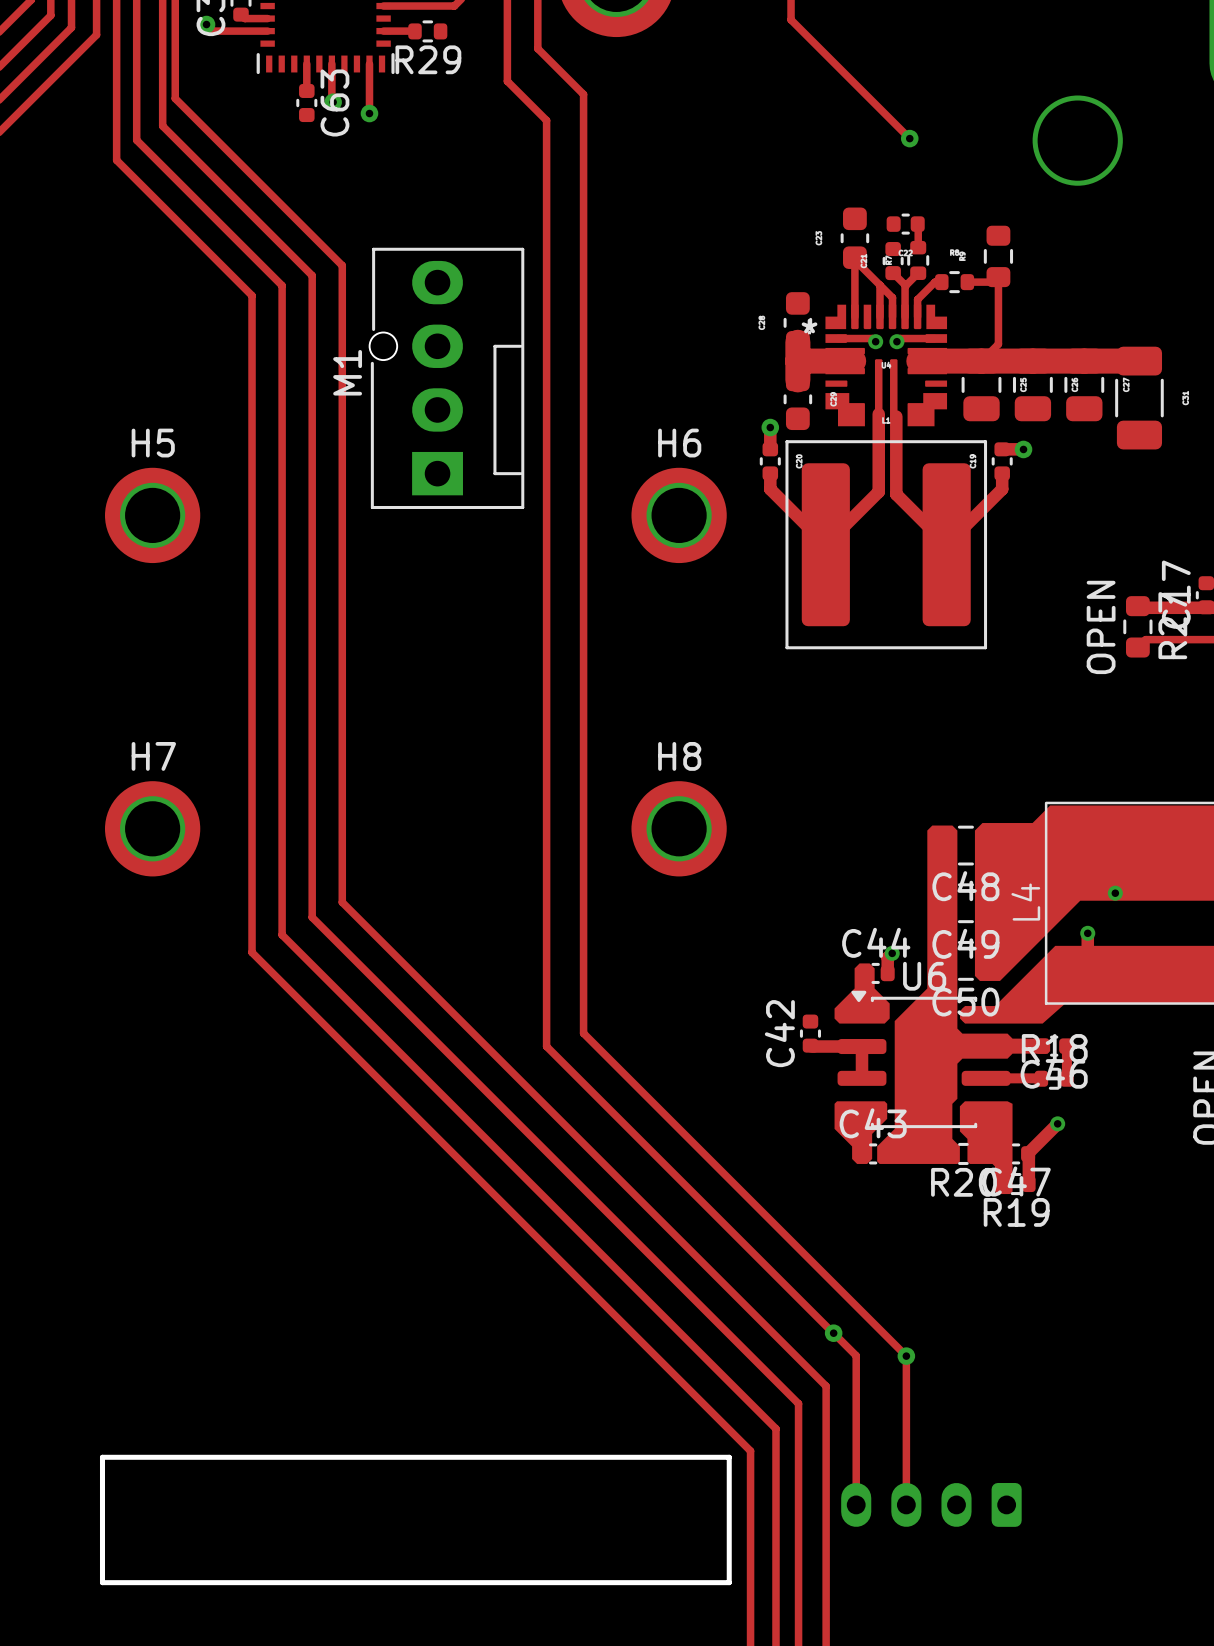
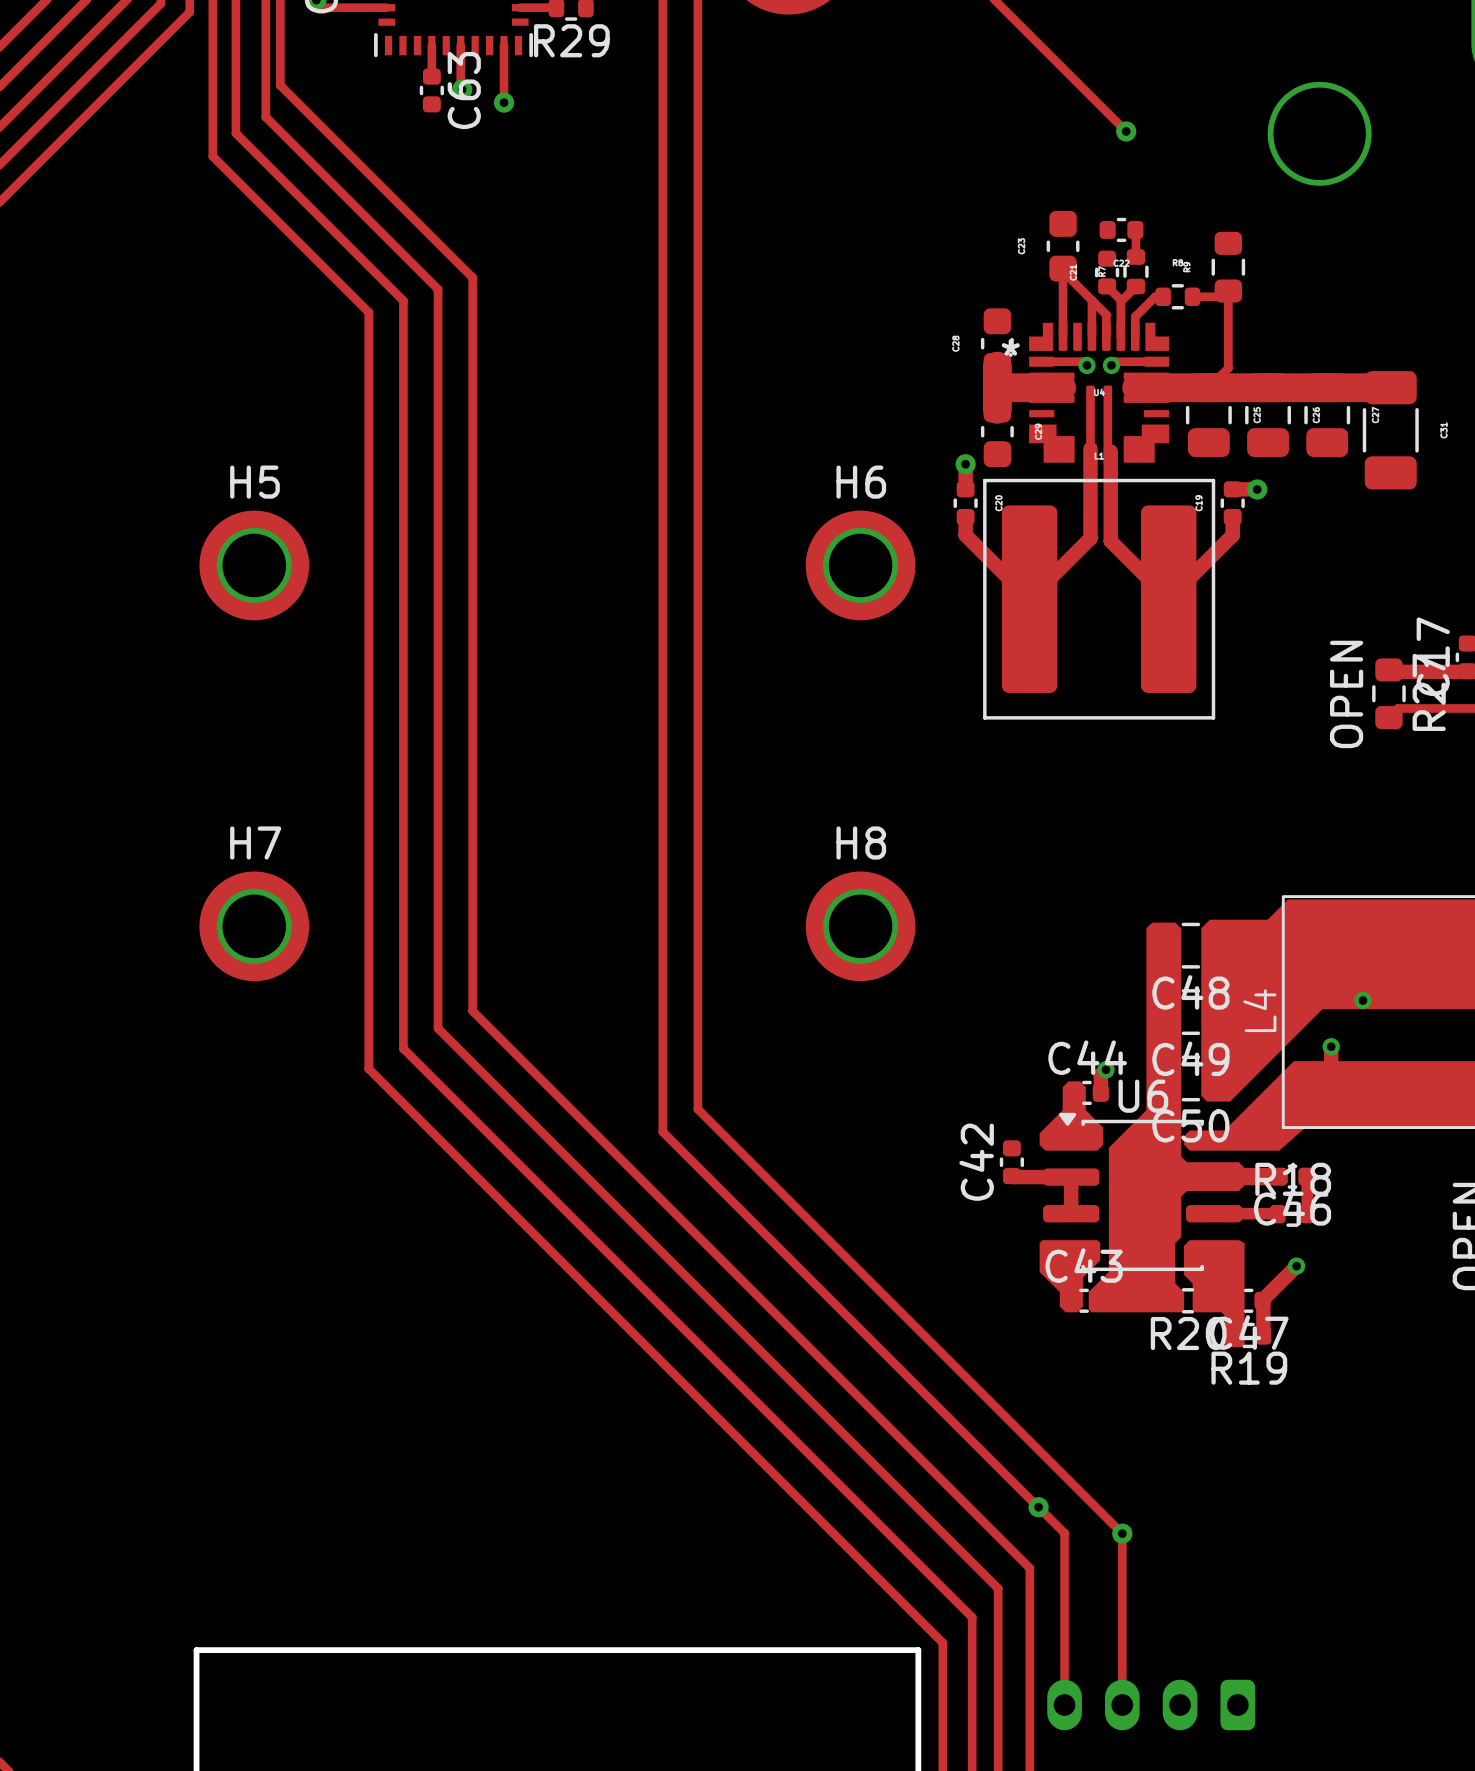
track: (537, 48) (583, 94) (583, 1033) -> (697, 27) (697, 1109) (750, 1161)
track: (507, 81) (546, 120) (546, 1046) -> (662, 65) (662, 1131) (707, 1177)
M1: (446, 378) -> none

